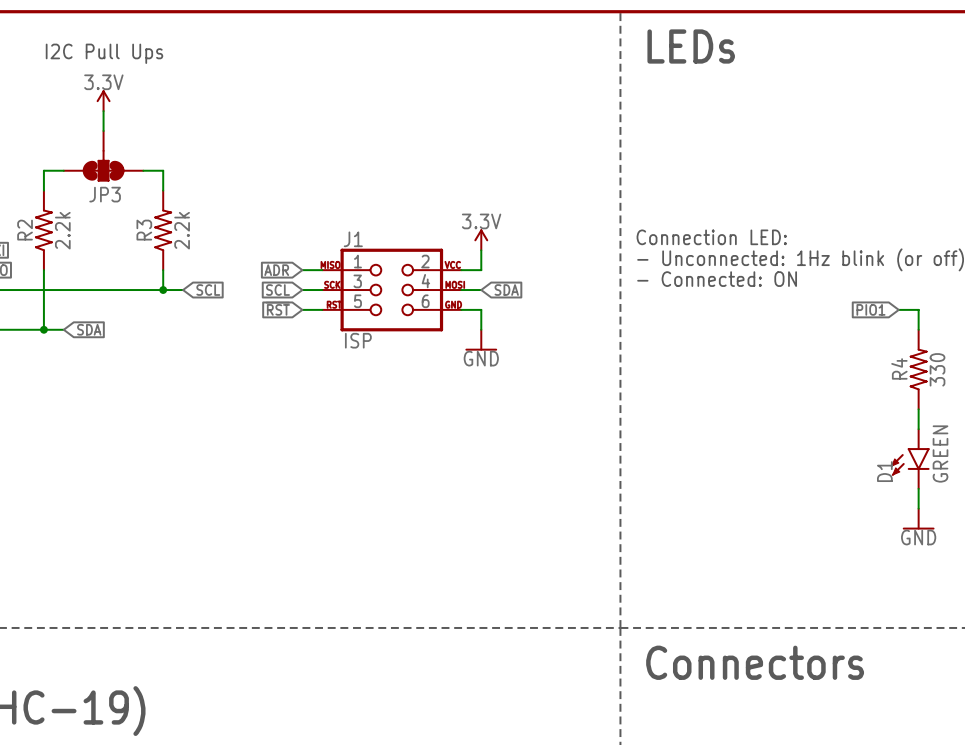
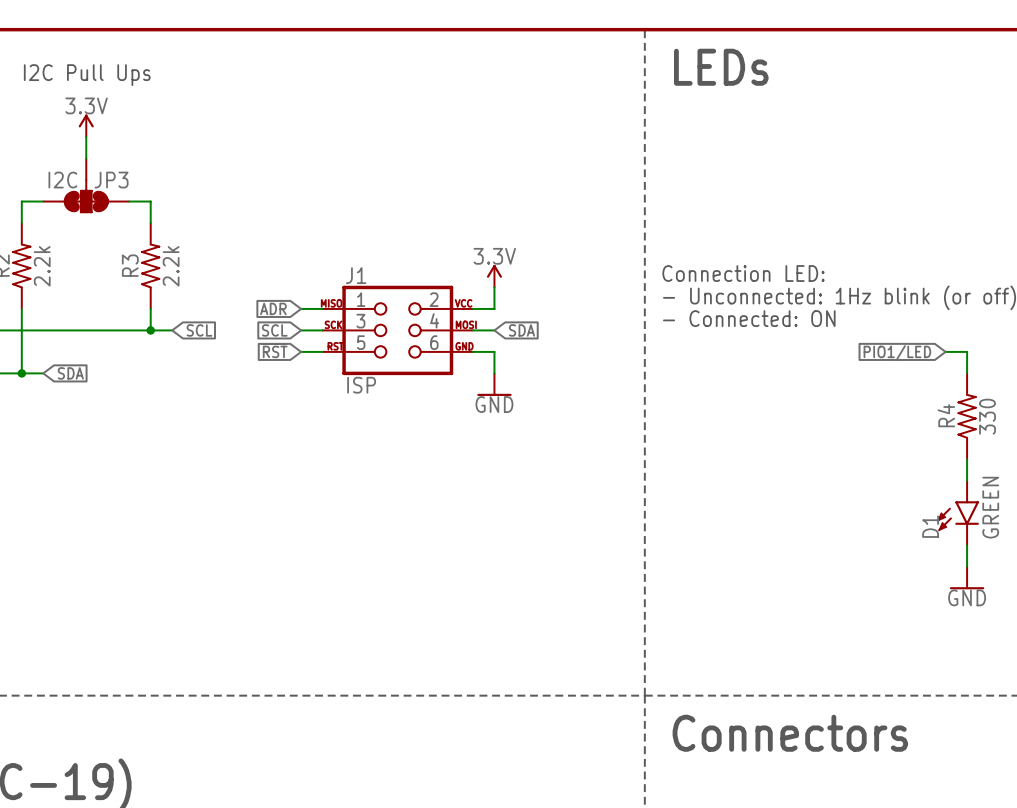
JP3 value: none -> I2C (62, 180)
JP3 name position: JP3 (105, 194) -> JP3 (111, 180)
global label: PIO1 (870, 309) -> PIO1/LED (897, 352)

